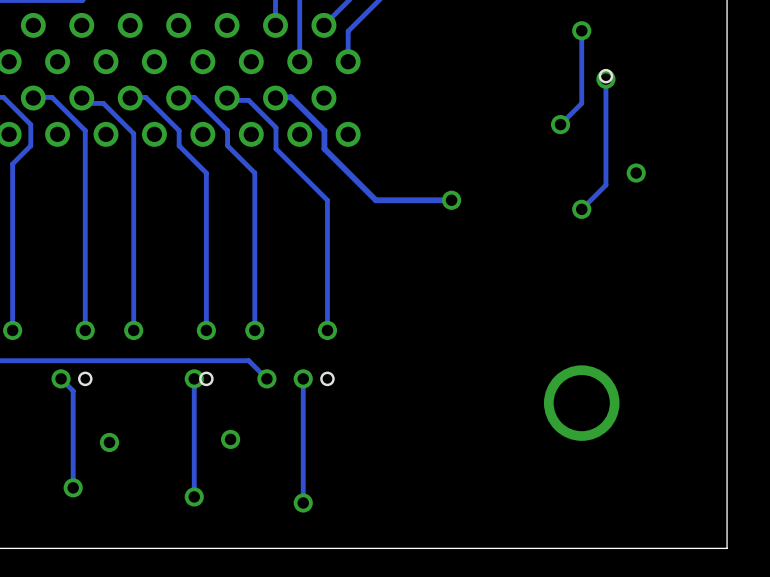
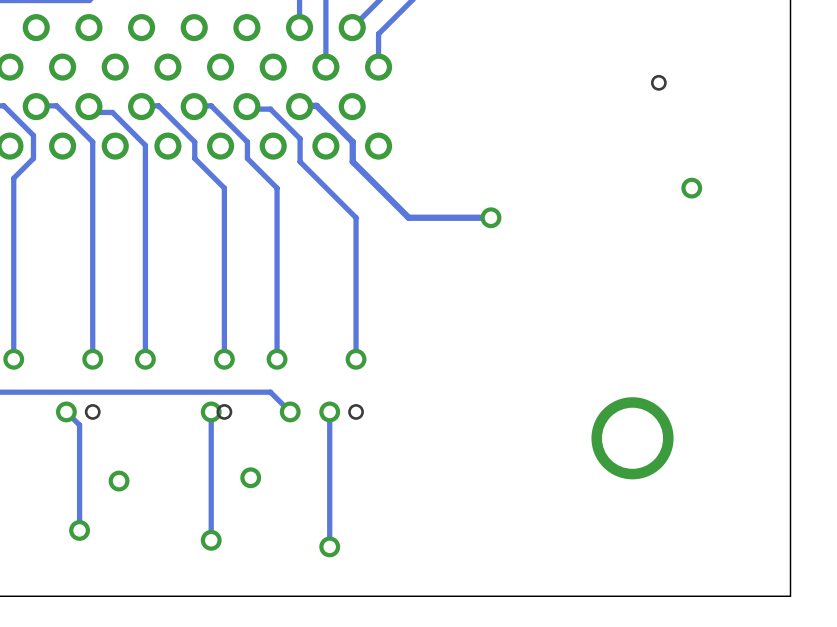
track: (581, 30) (581, 103) (560, 124) -> none
via: (581, 30) -> none
track: (605, 79) (605, 185) (581, 209) -> none
via: (605, 79) -> none
via: (560, 124) -> none
via: (581, 209) -> none

